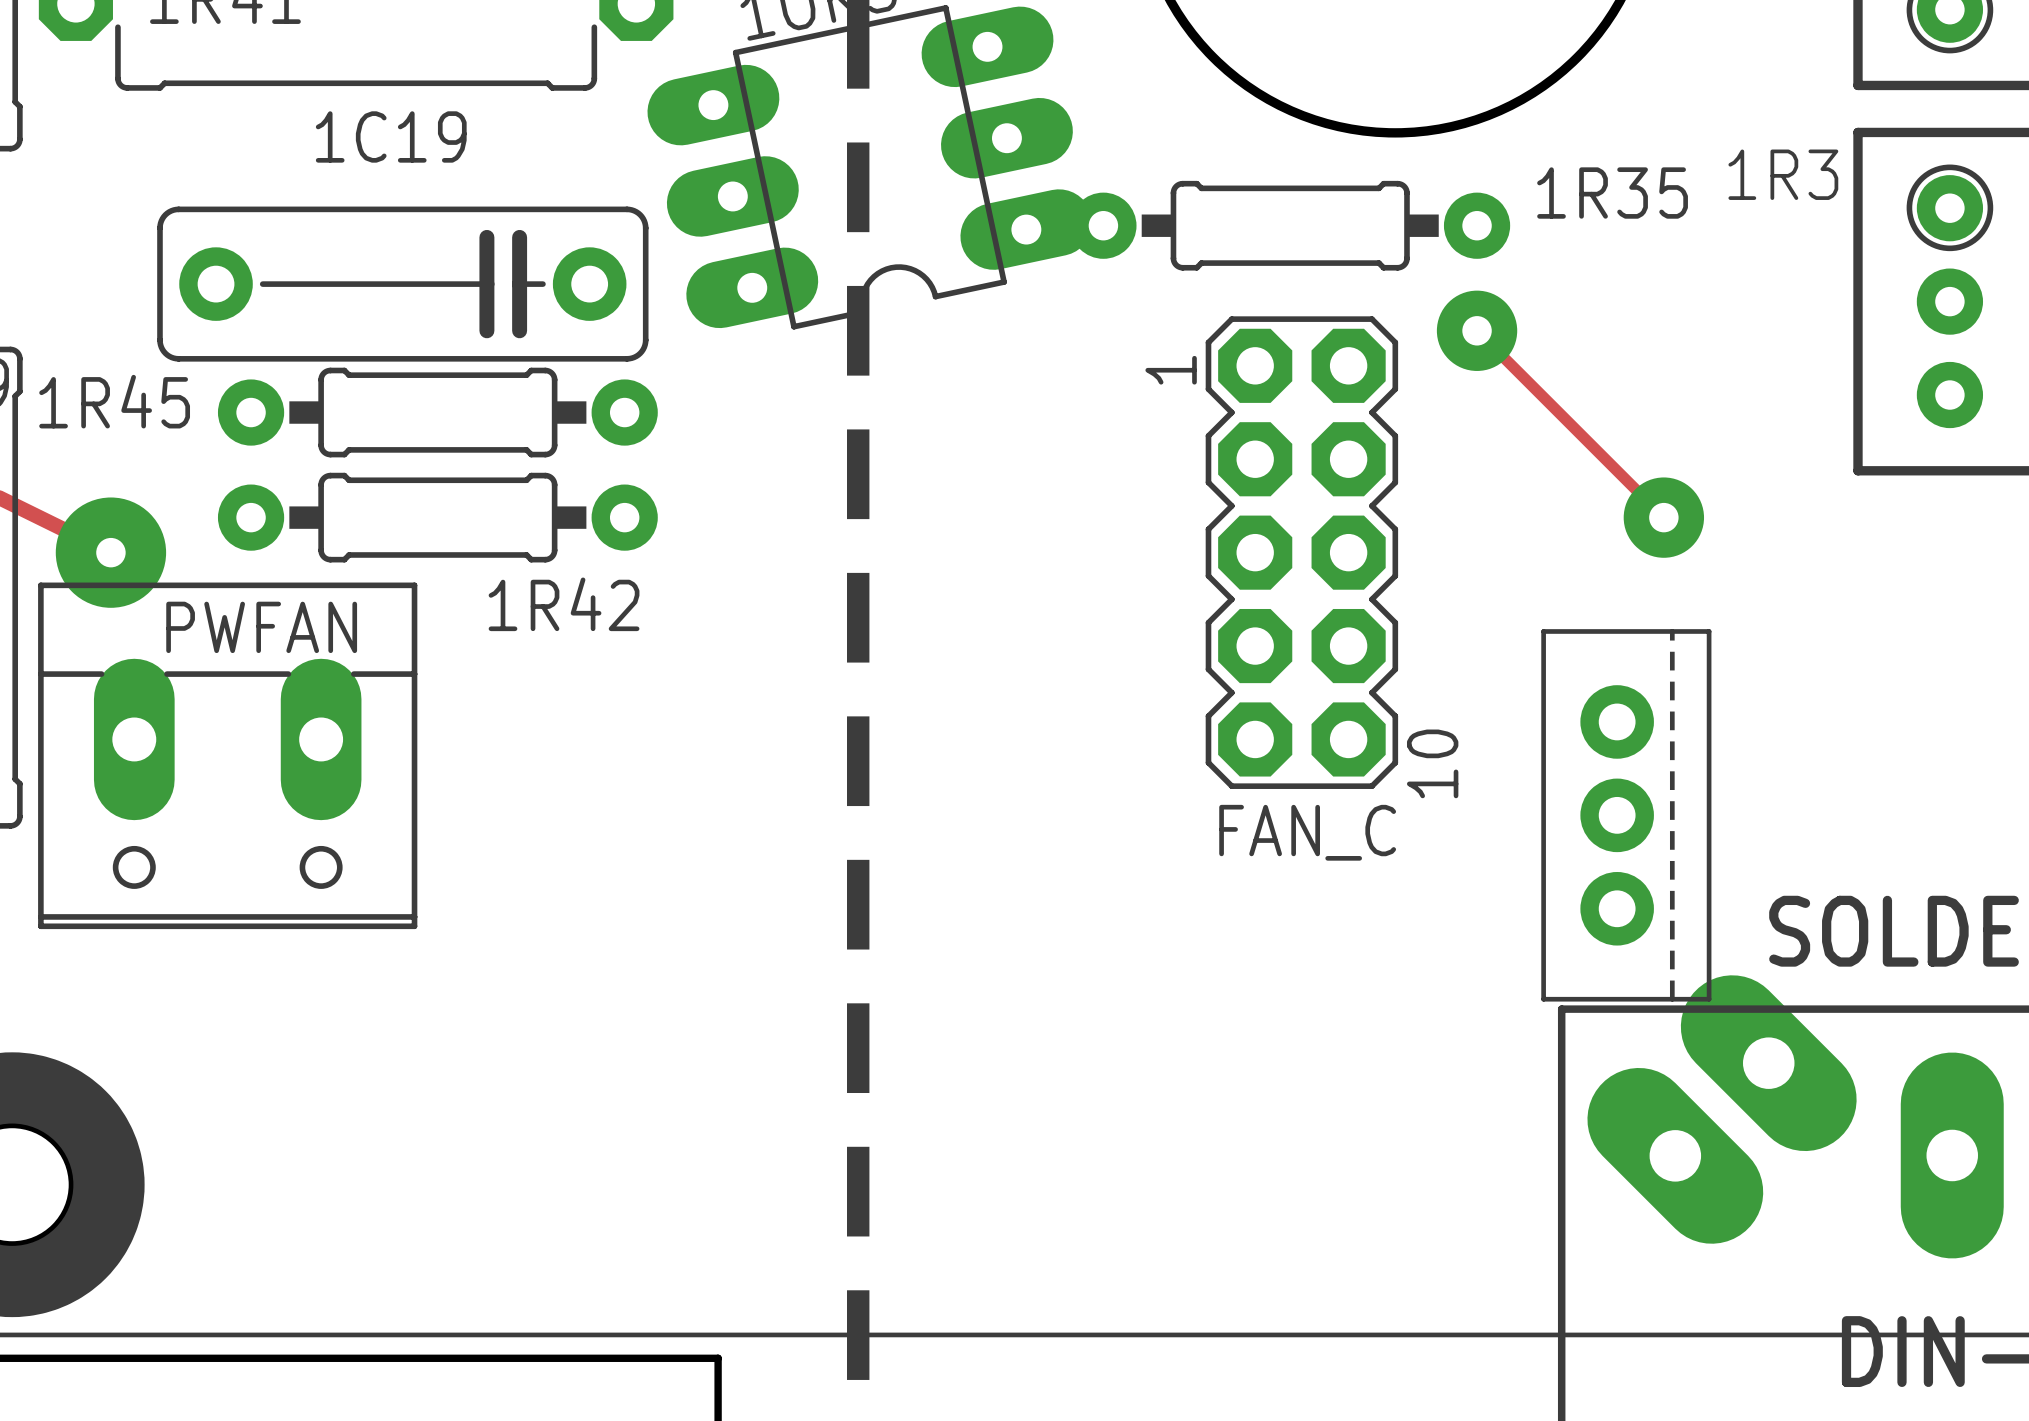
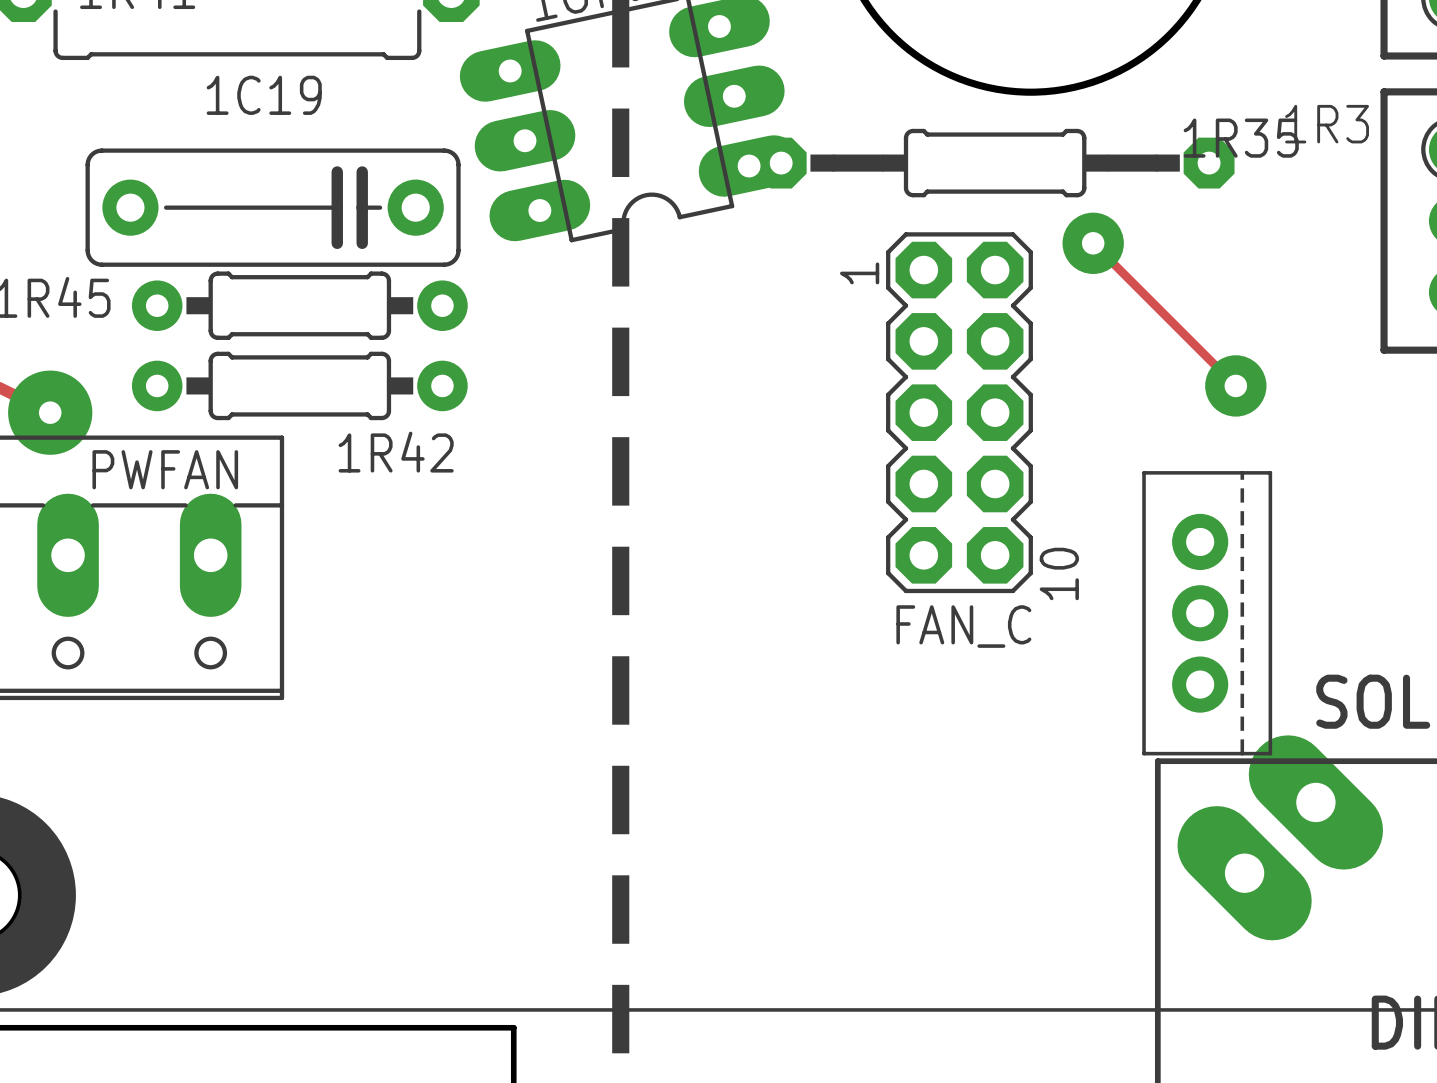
1R35 footprint: [1070, 180, 1511, 271] -> [755, 128, 1235, 198]

